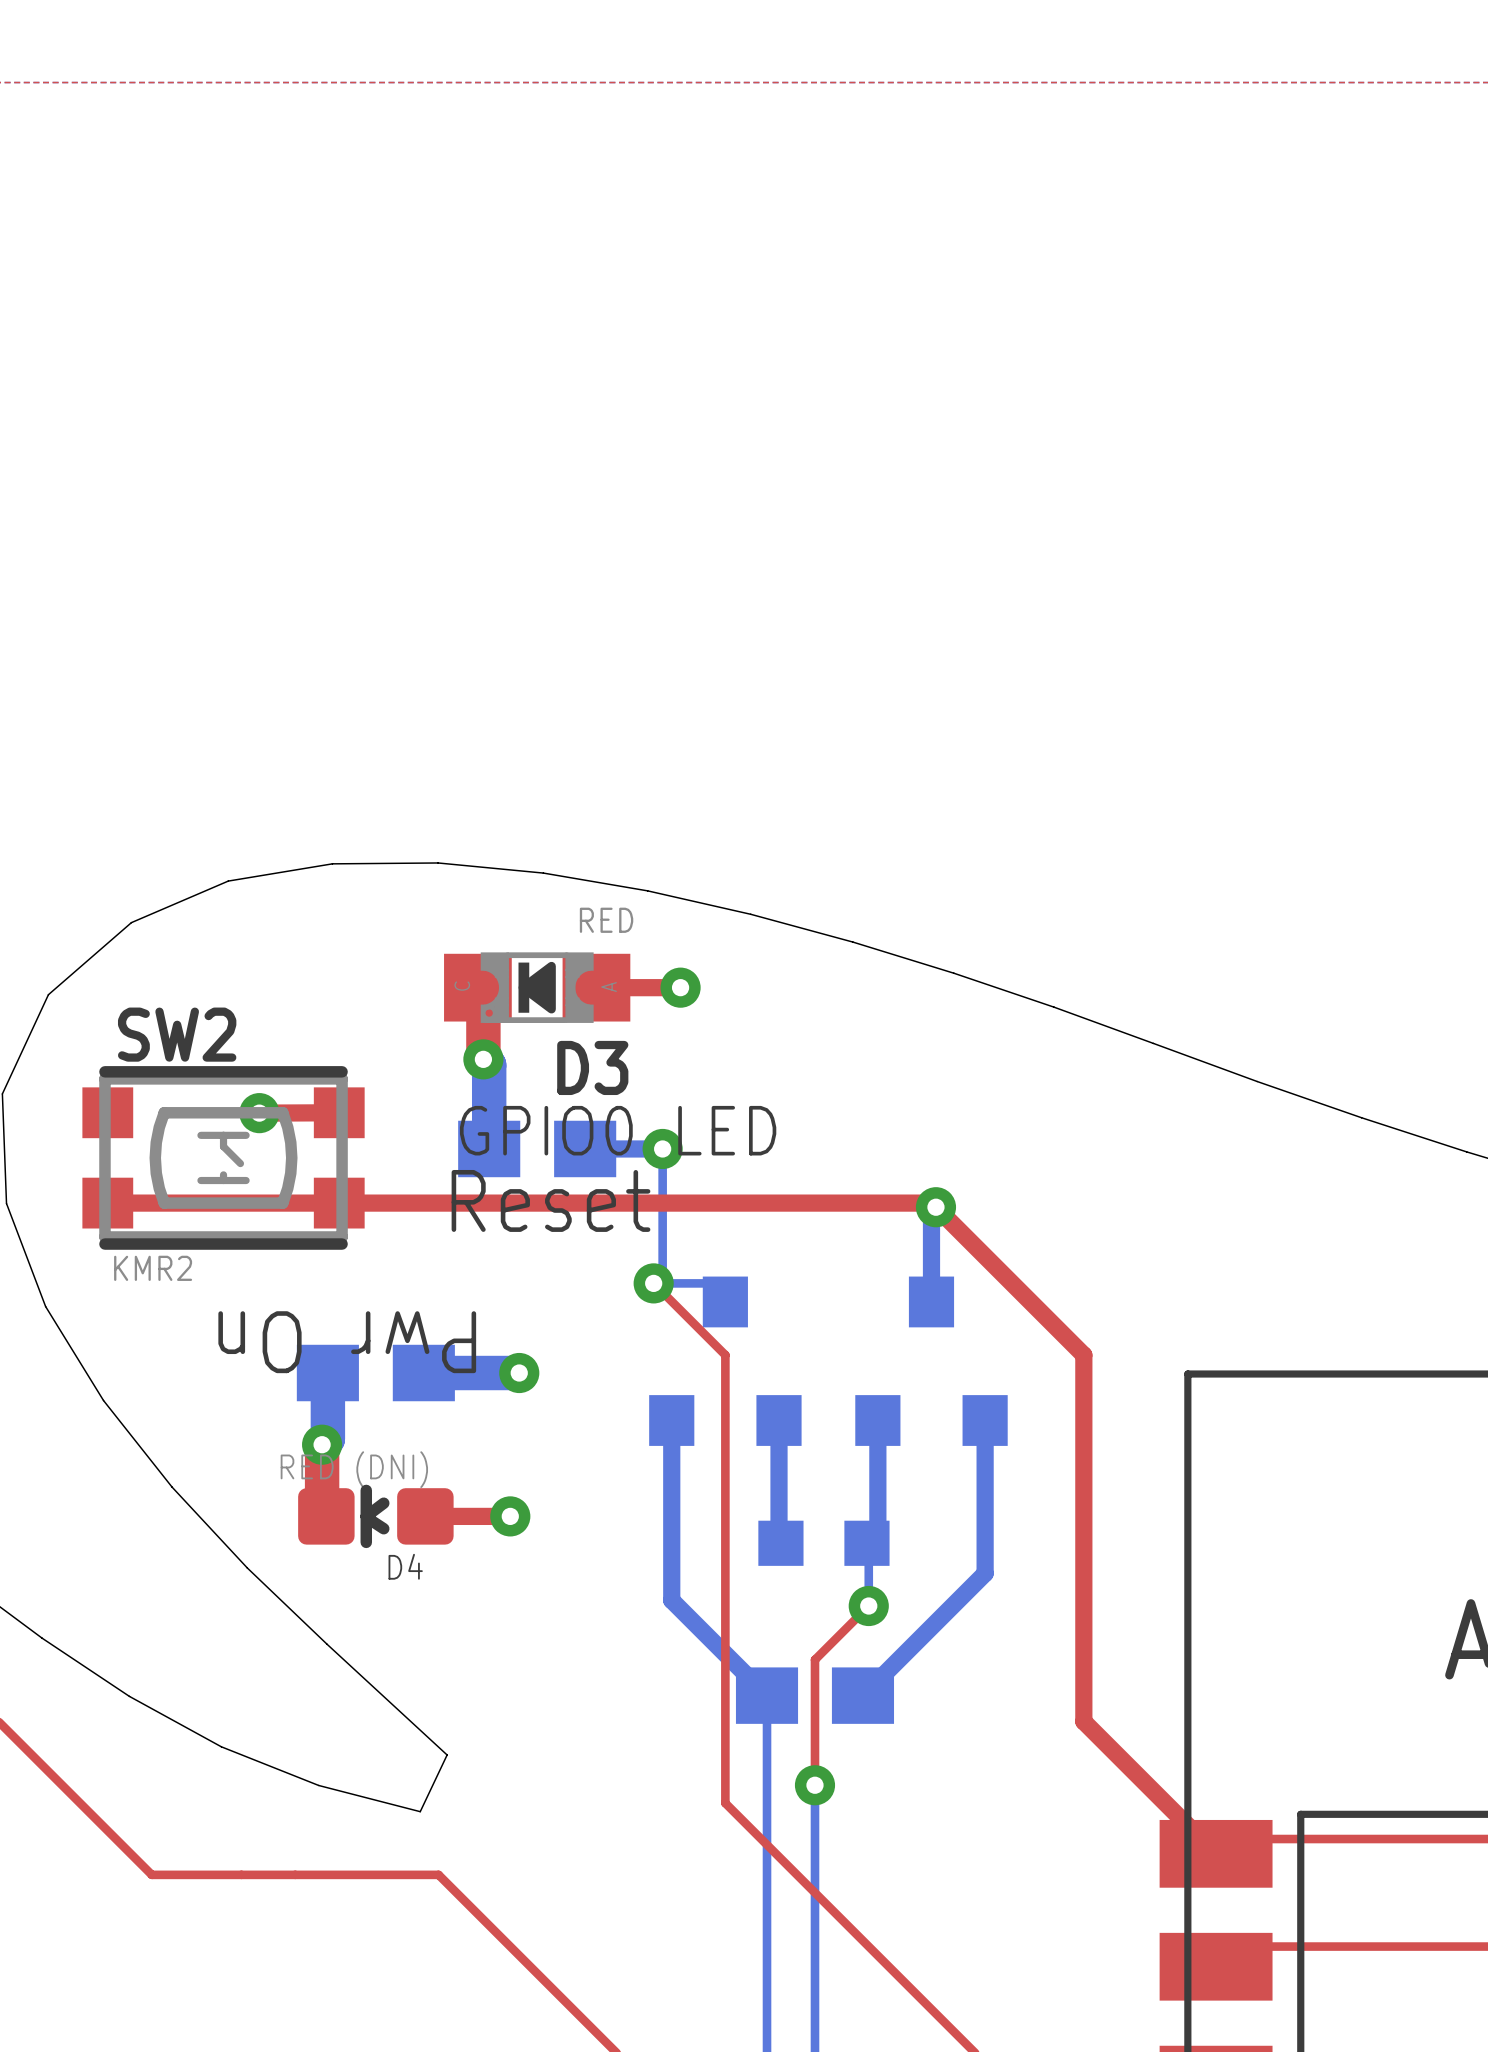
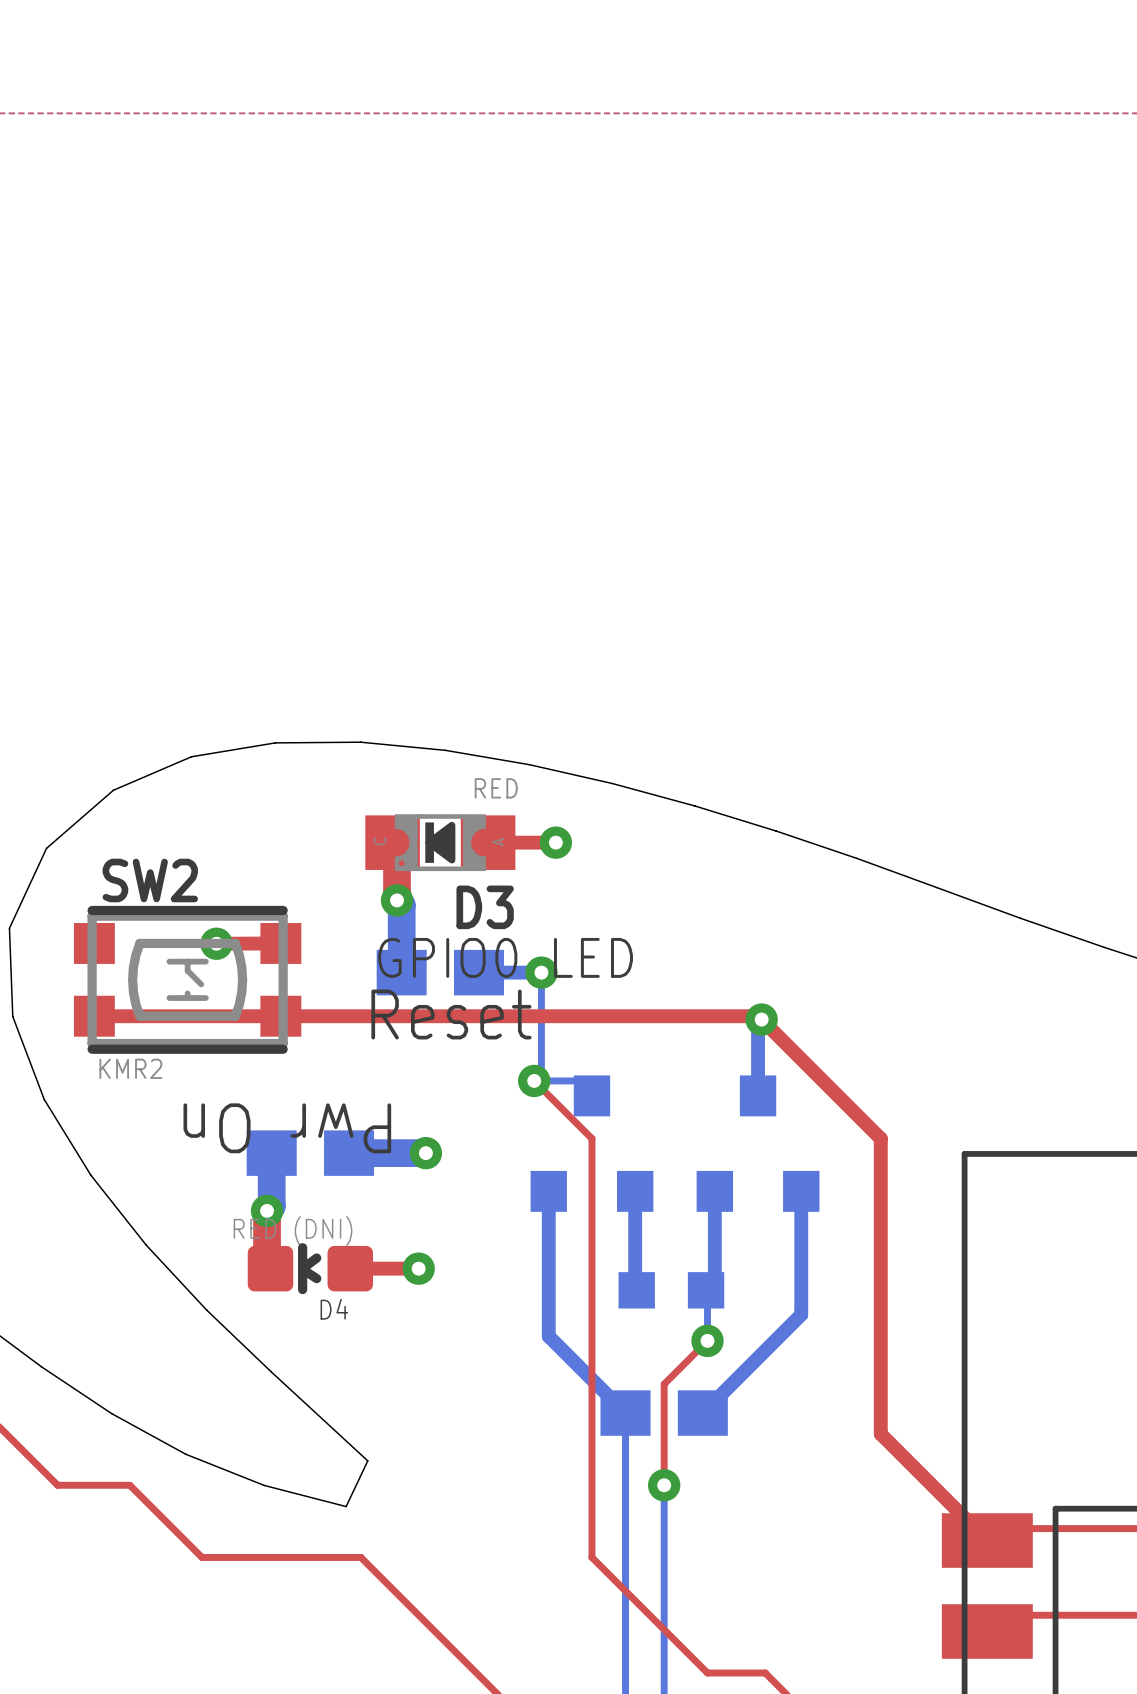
top track: (62, 1785) (151, 1874) (241, 1874) -> (57, 1485) (129, 1485) (202, 1557)
top track: (725, 1803) (940, 2018) -> (591, 1499) (591, 1557) (707, 1673) (765, 1673)

